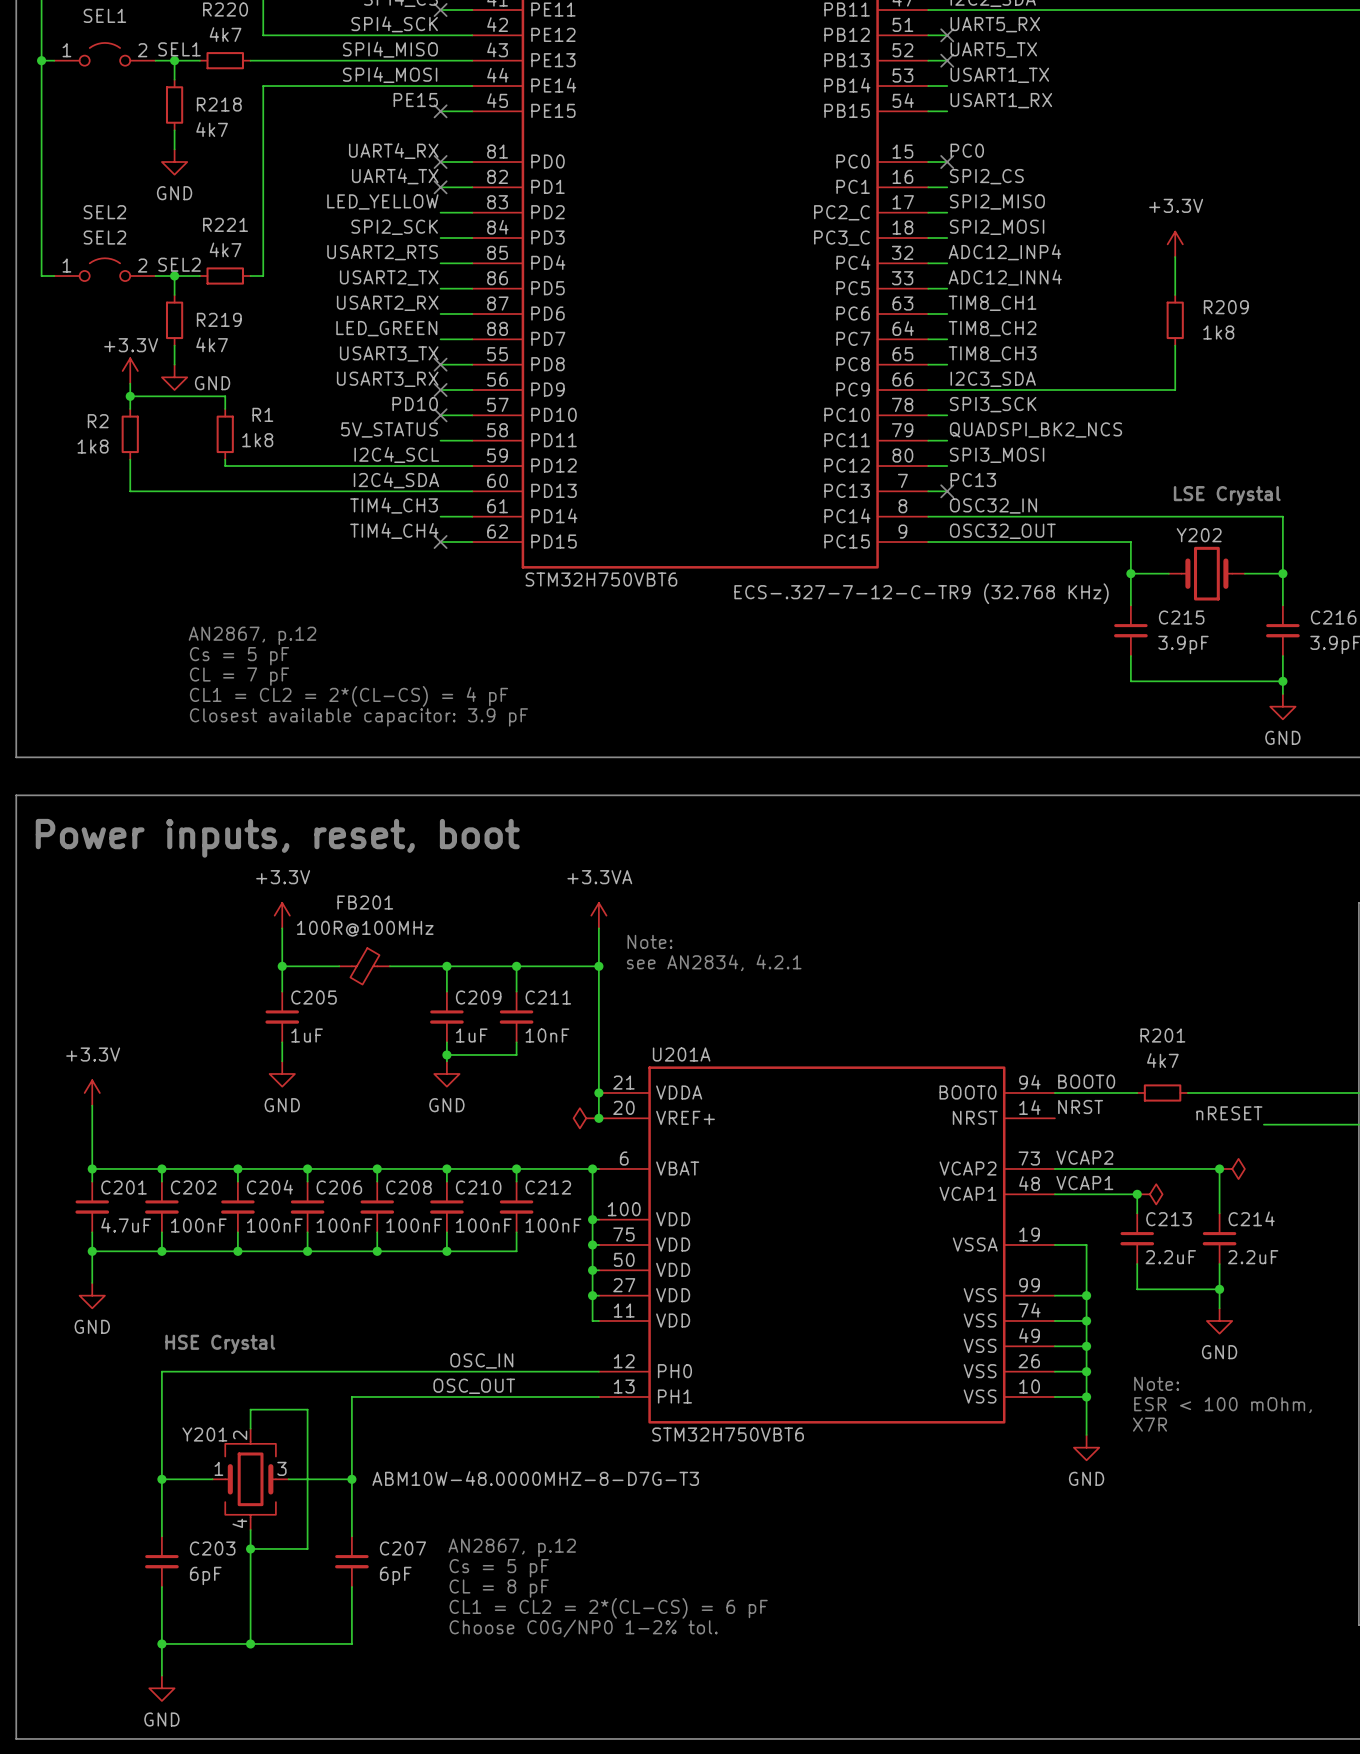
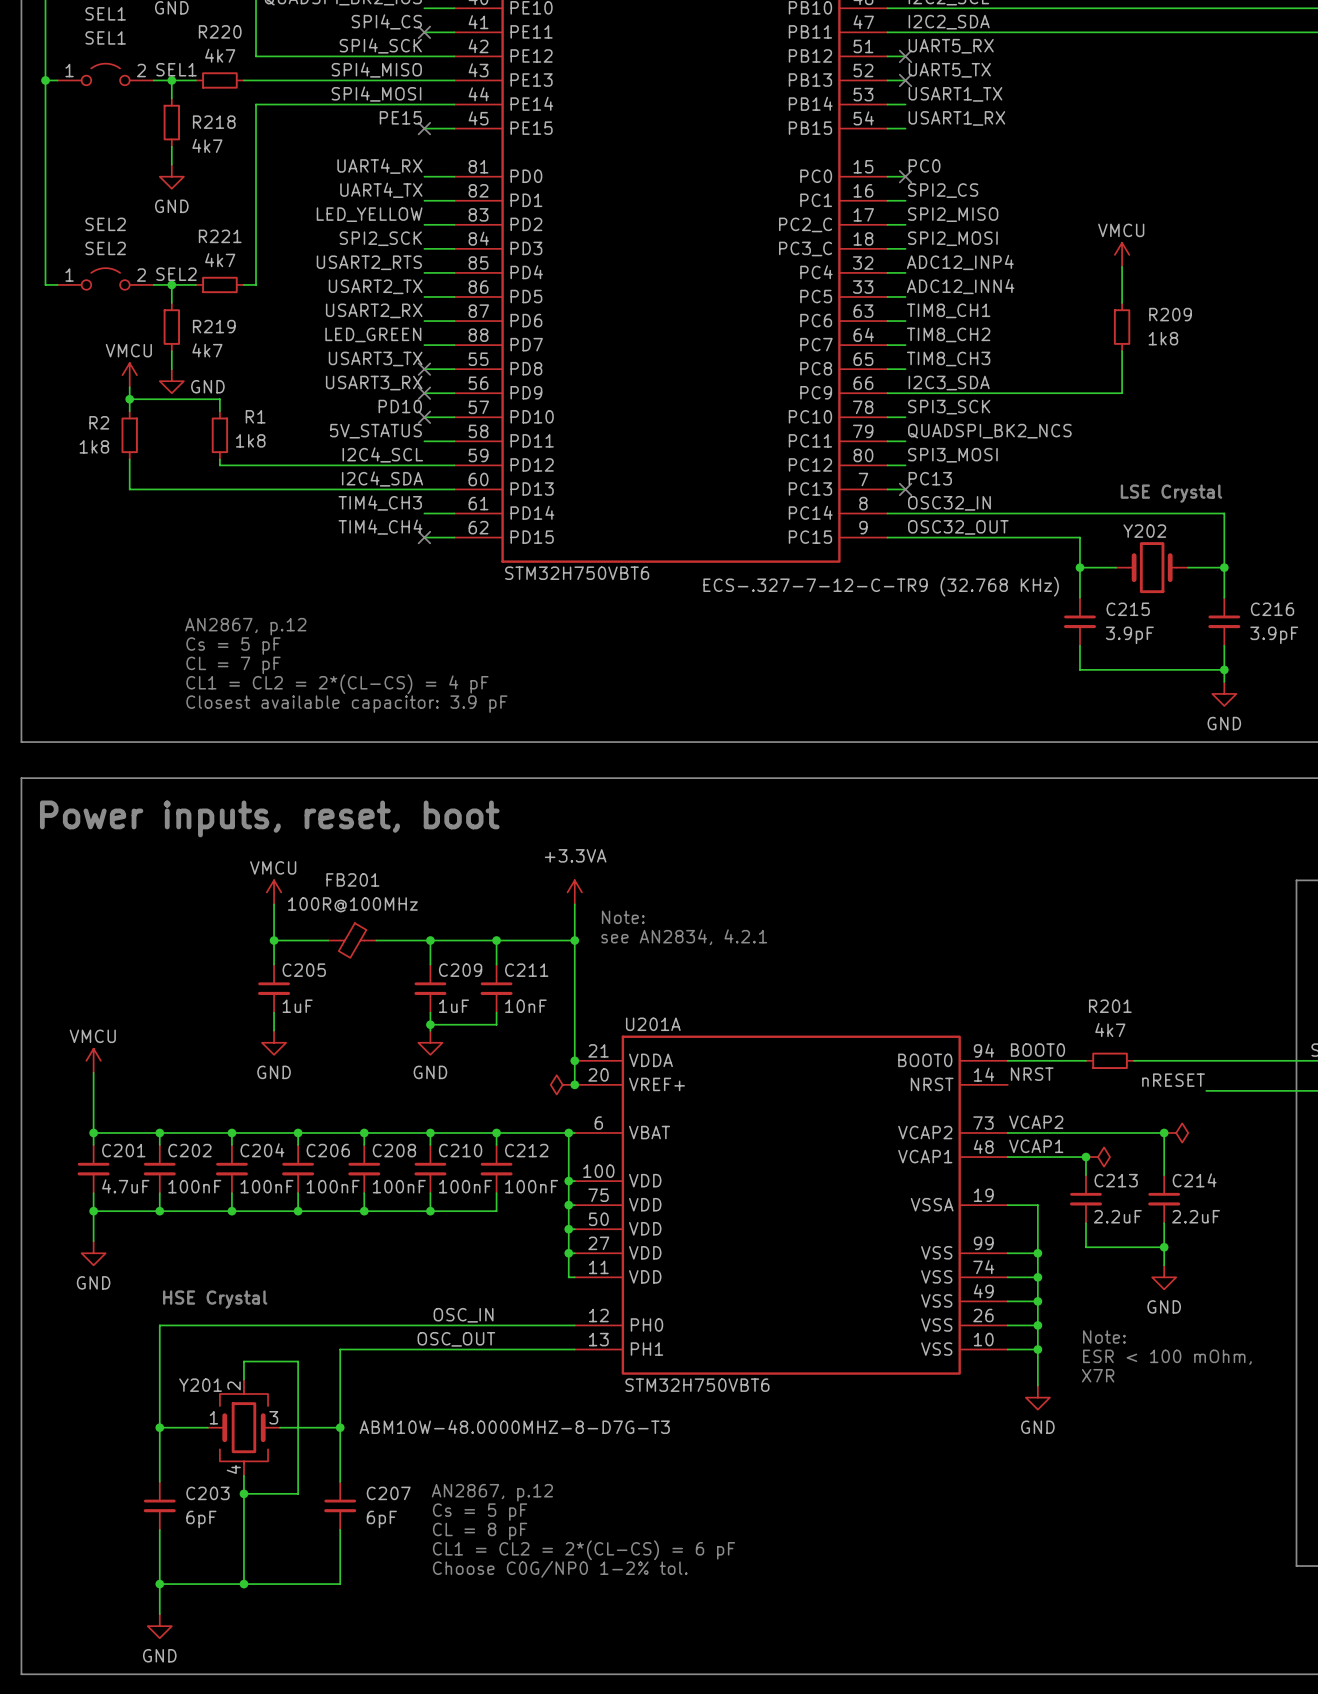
no-connect mark: (440, 162) -> none
no-connect mark: (440, 187) -> none
power symbol: +3.3V (1175, 244) -> VMCU (1122, 254)
power symbol: +3.3V (130, 371) -> VMCU (129, 375)
power symbol: +3.3V (282, 915) -> VMCU (274, 892)
power symbol: +3.3V (92, 1092) -> VMCU (93, 1060)

